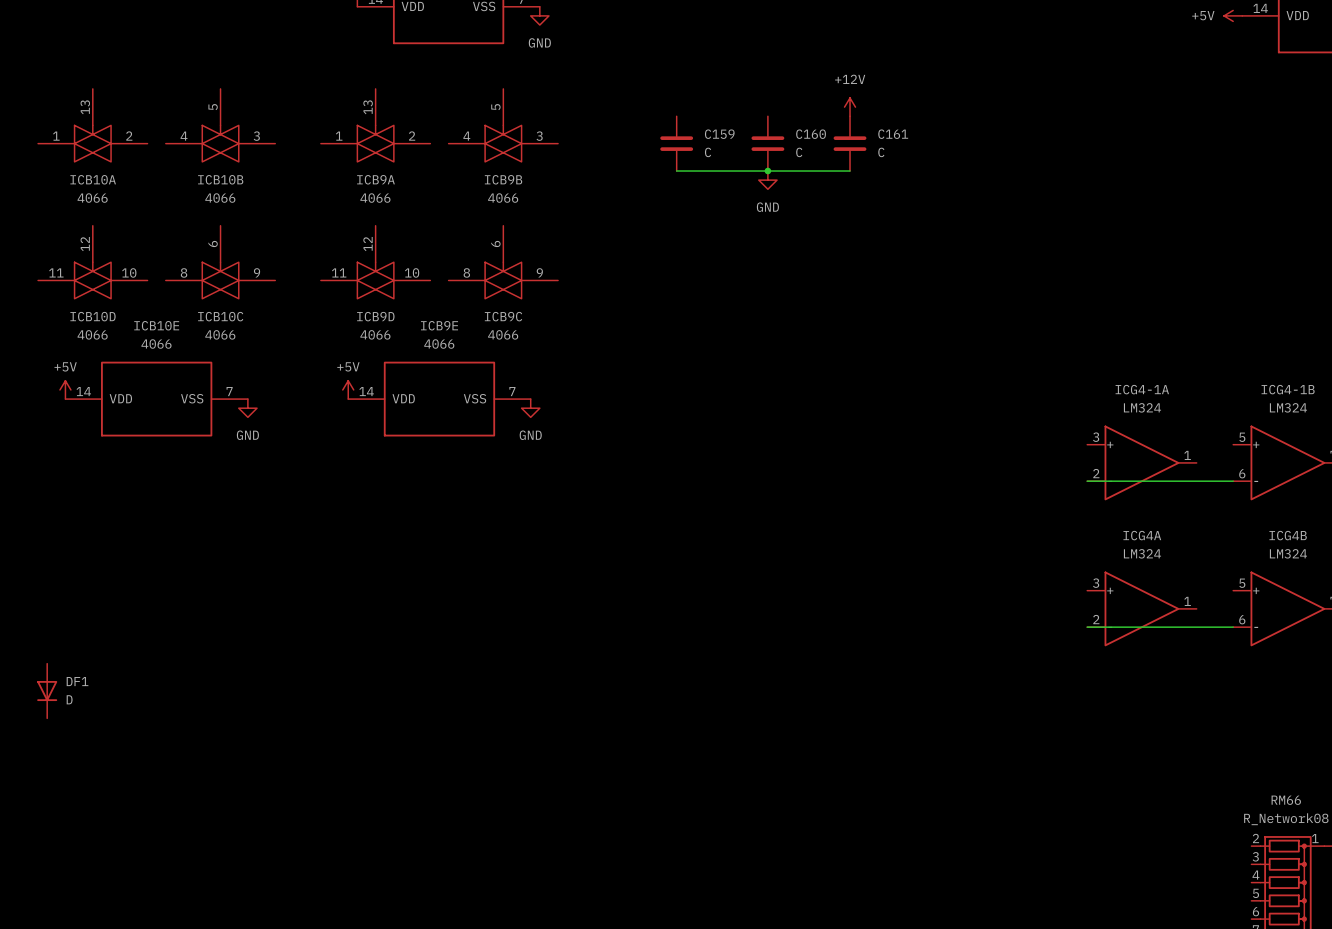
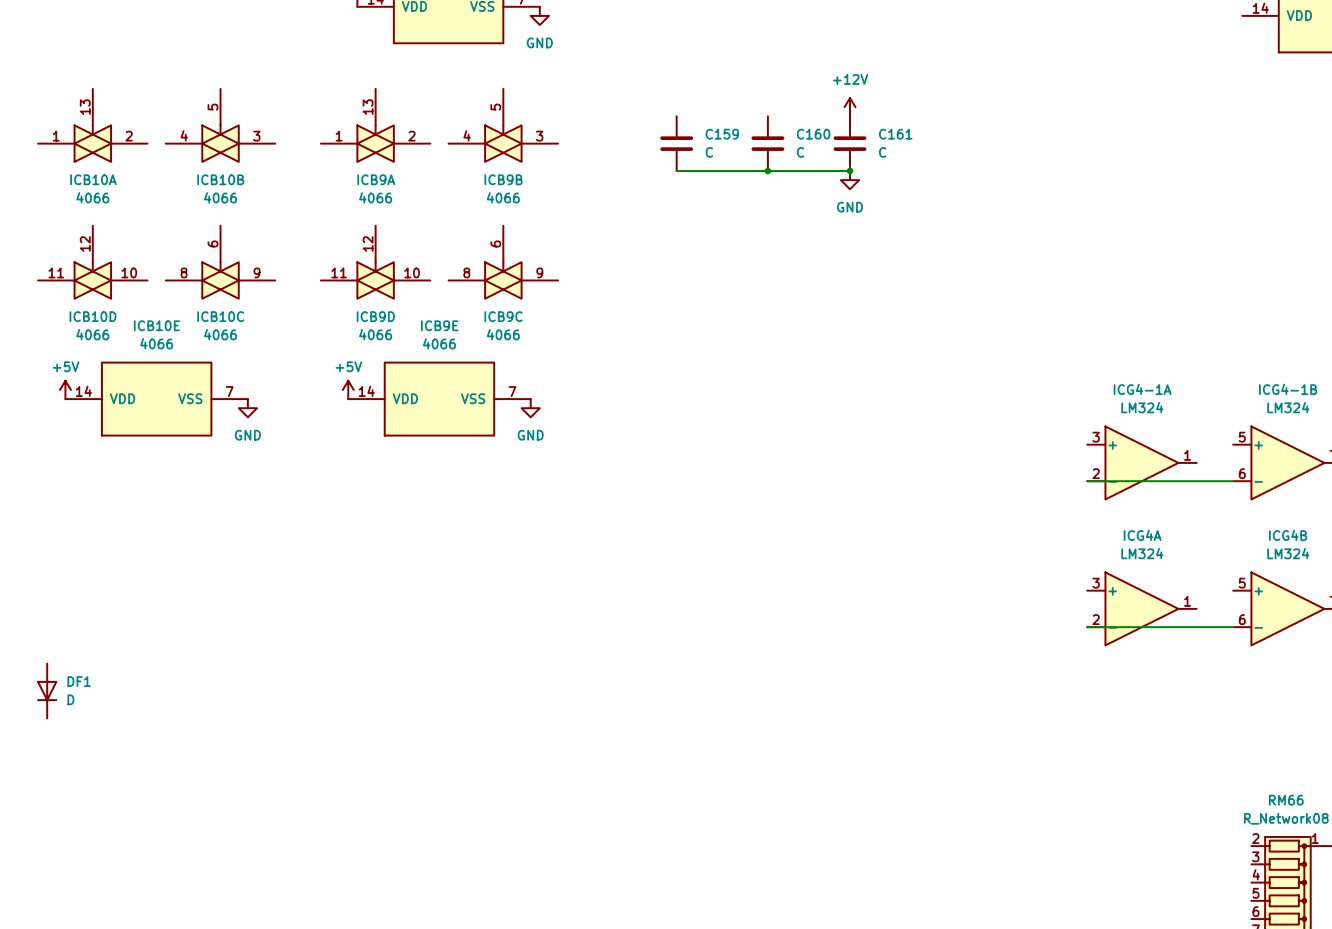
power symbol: +5V (1233, 15) -> none
junction: none -> (850, 171)
power symbol position: GND (767, 180) -> GND (850, 180)

